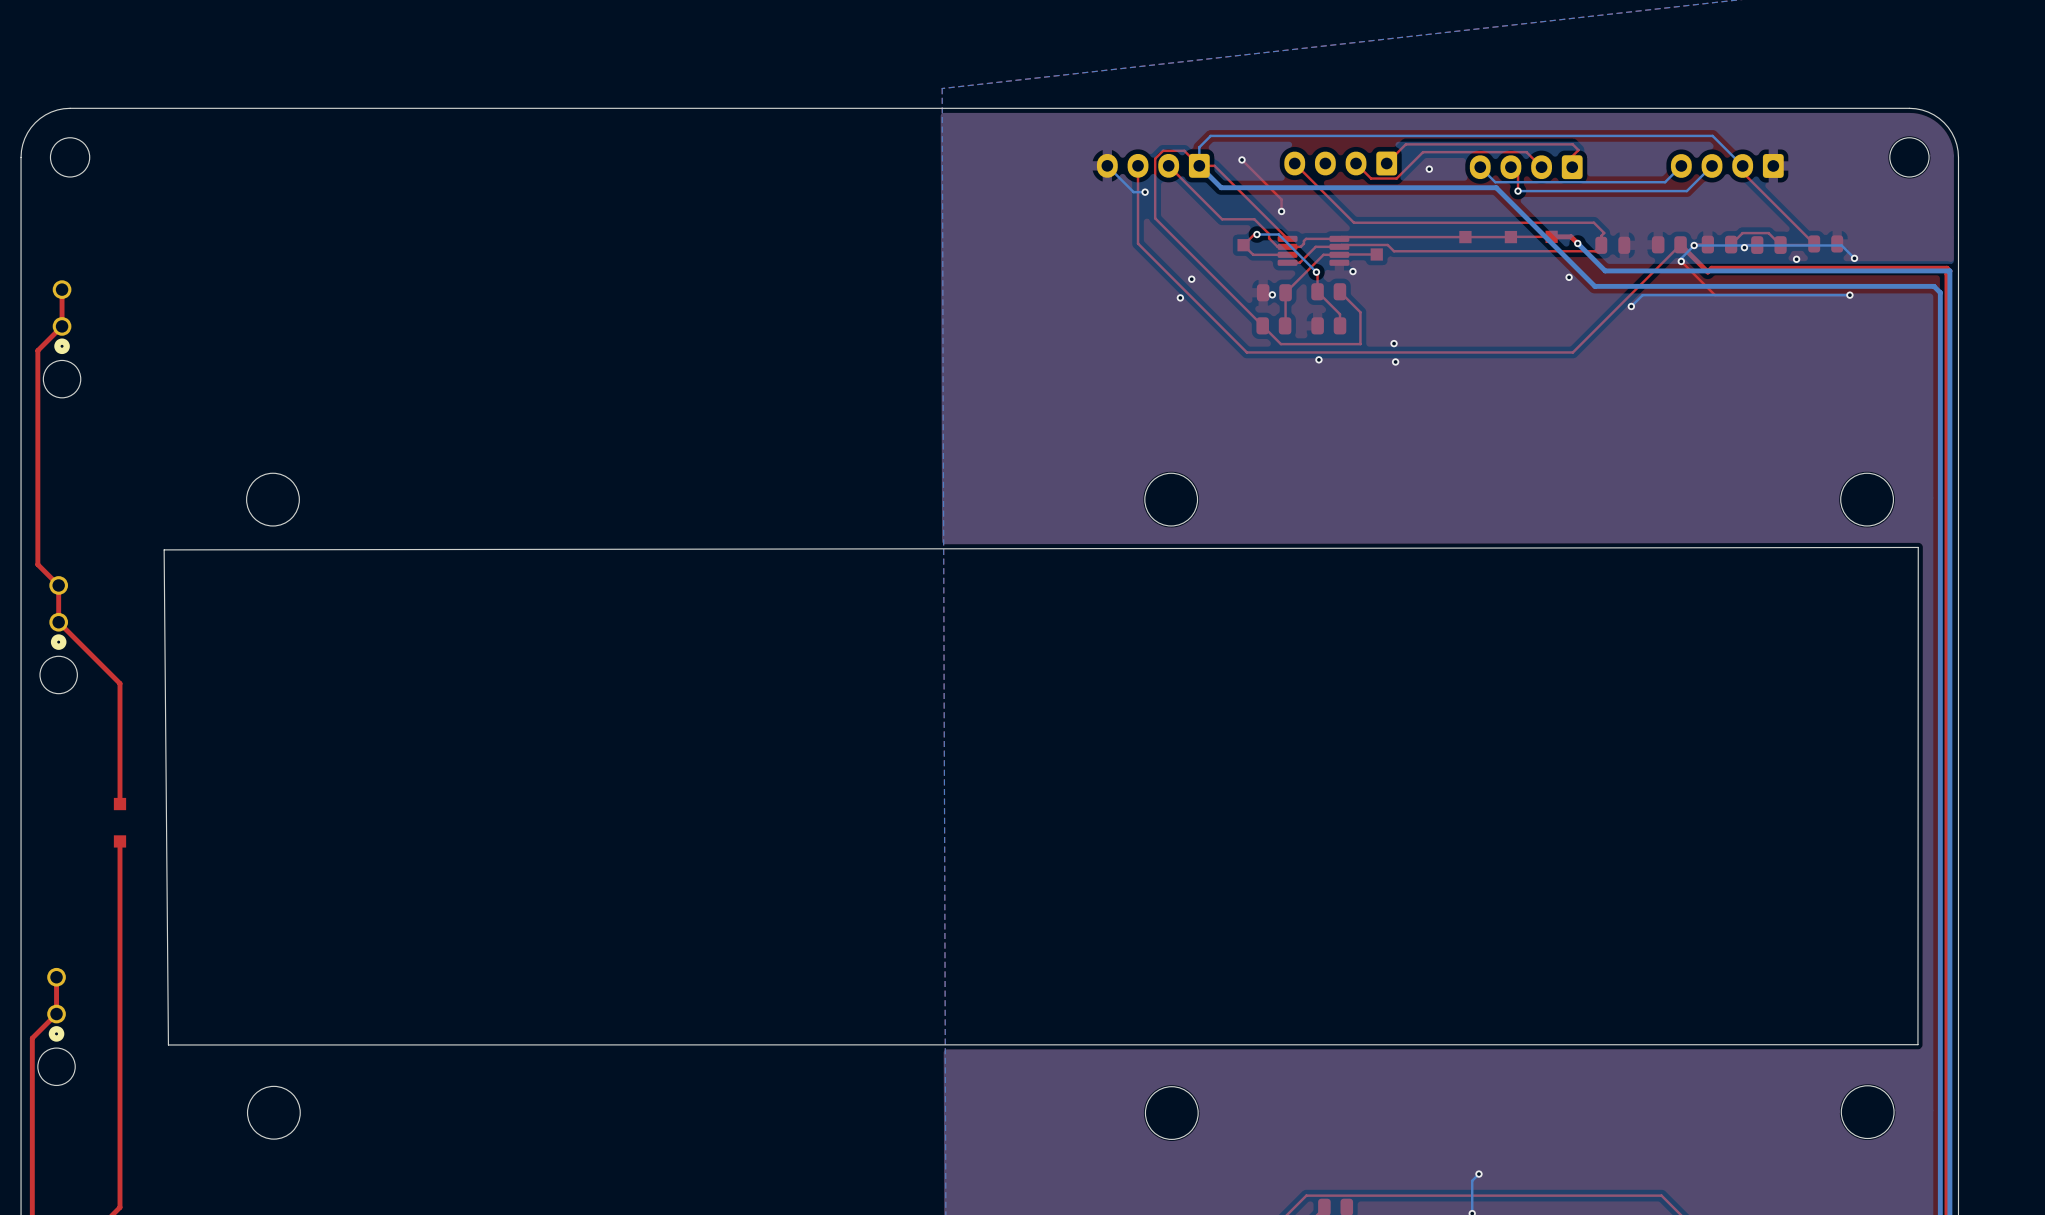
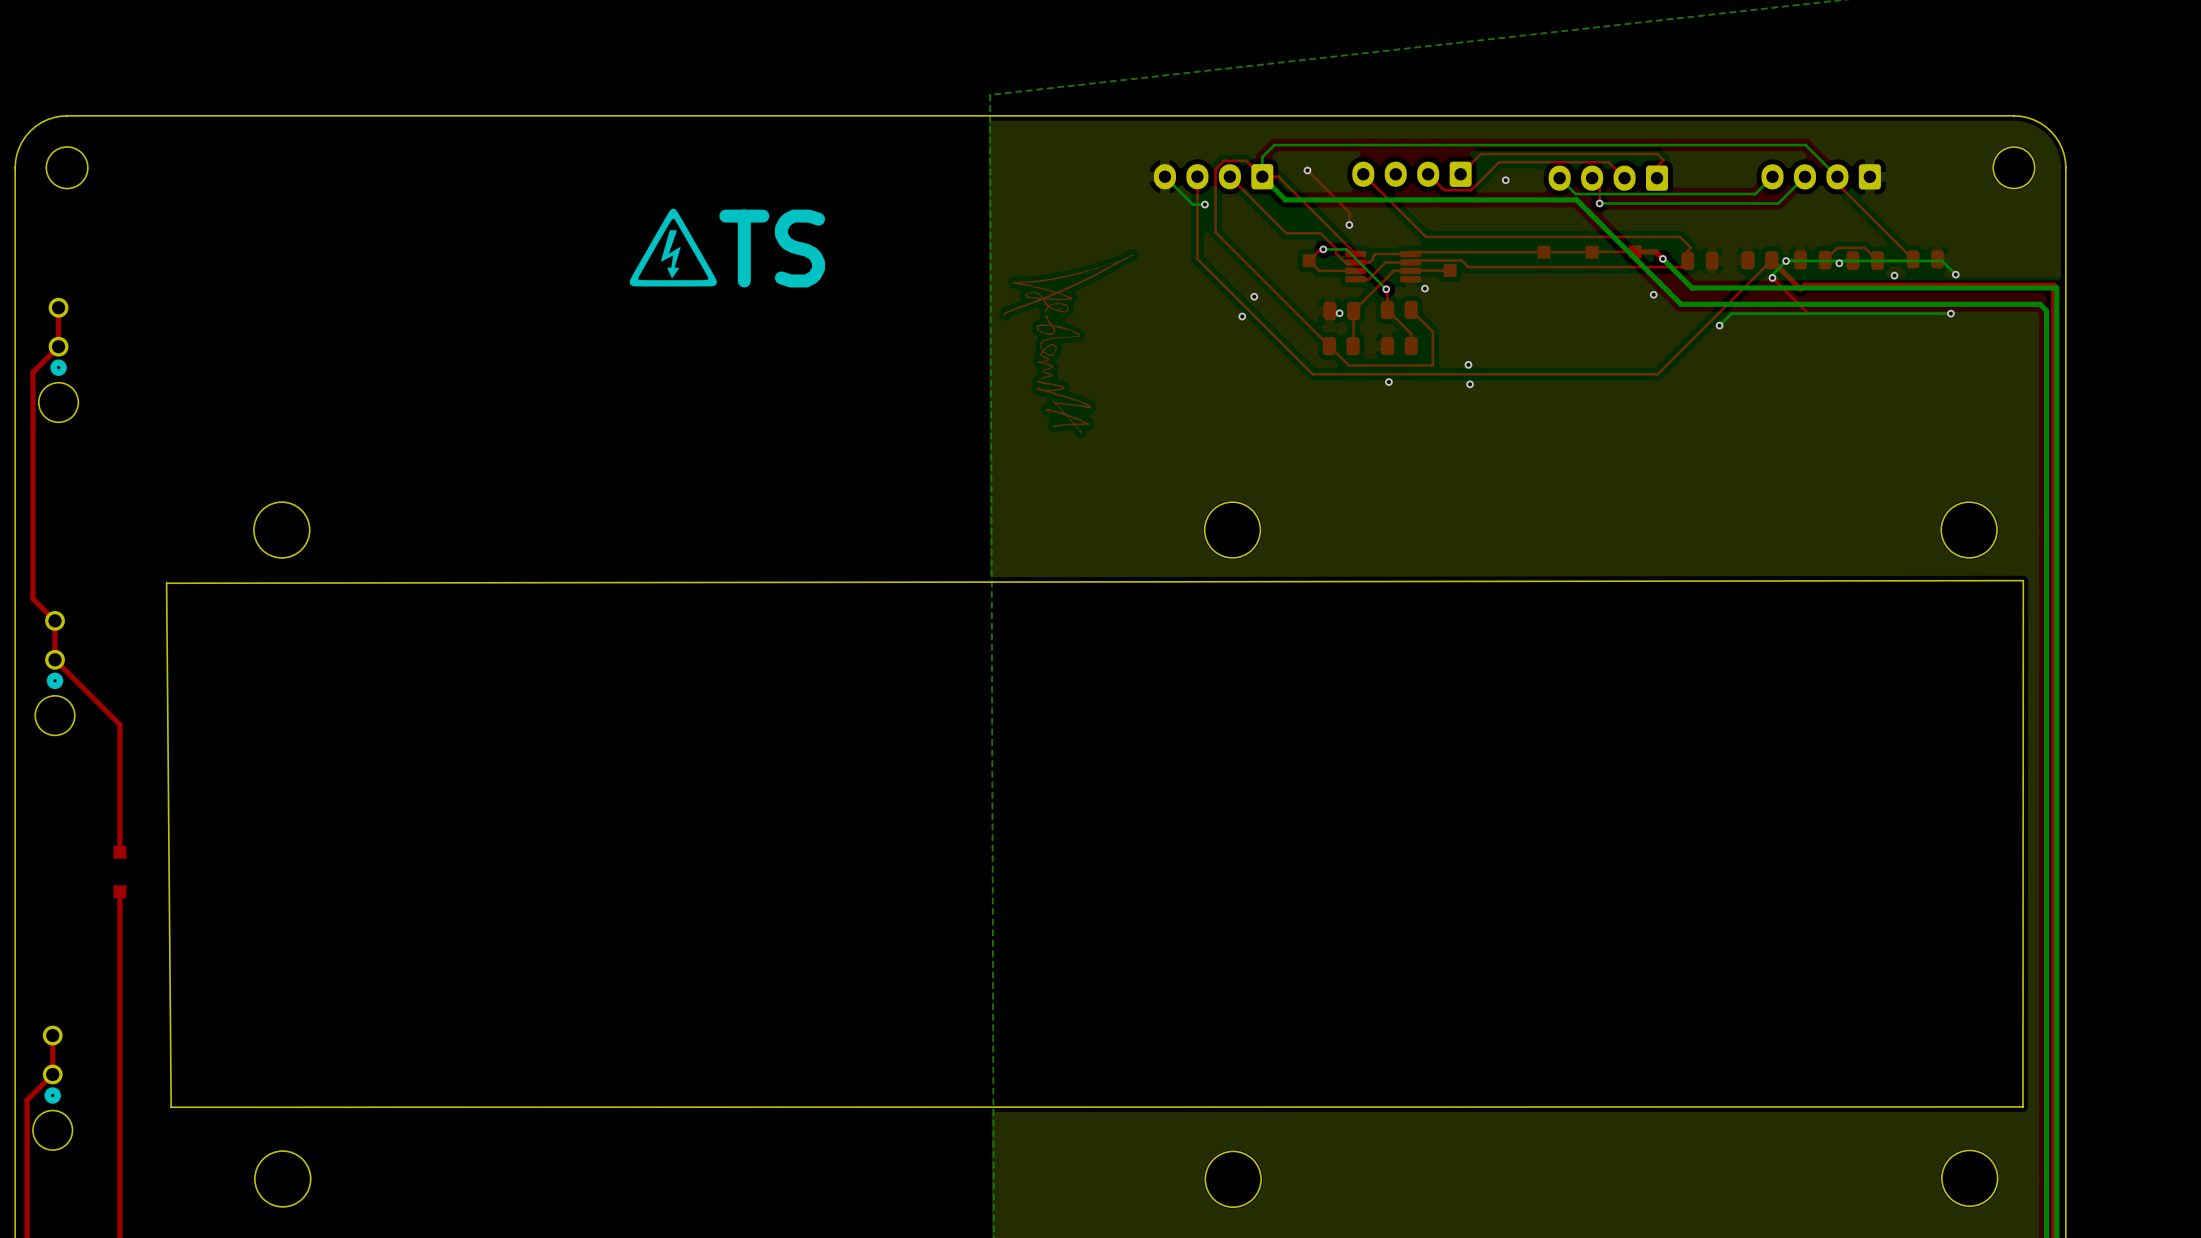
drawing: none -> [629, 208, 717, 287]
drawing: none -> [1003, 254, 1134, 434]

